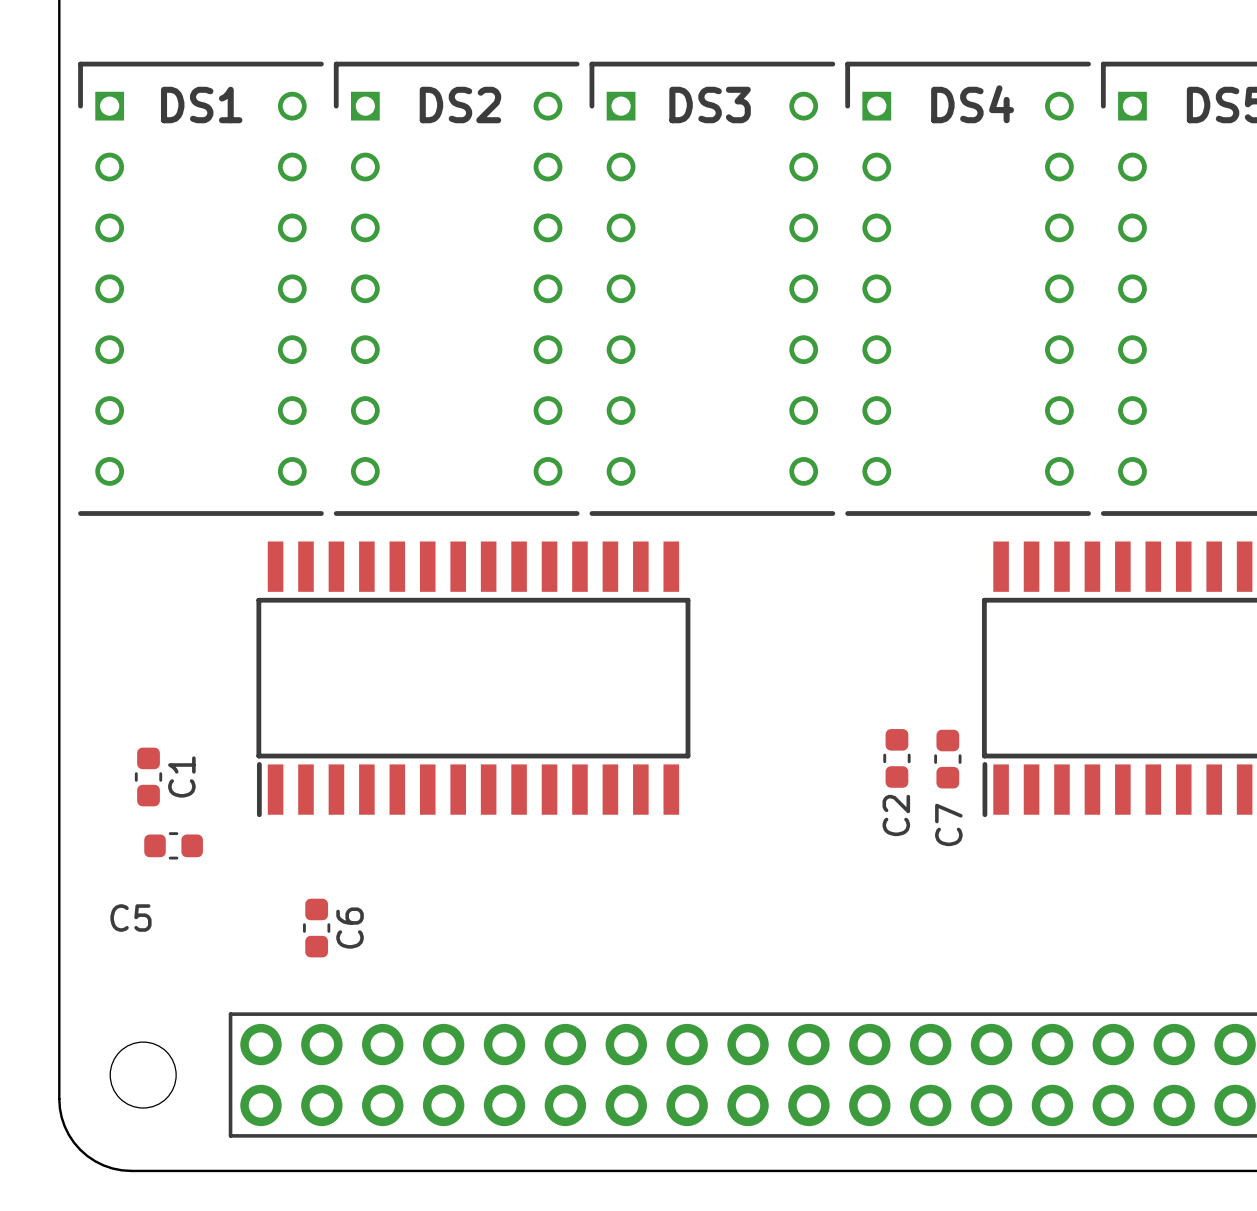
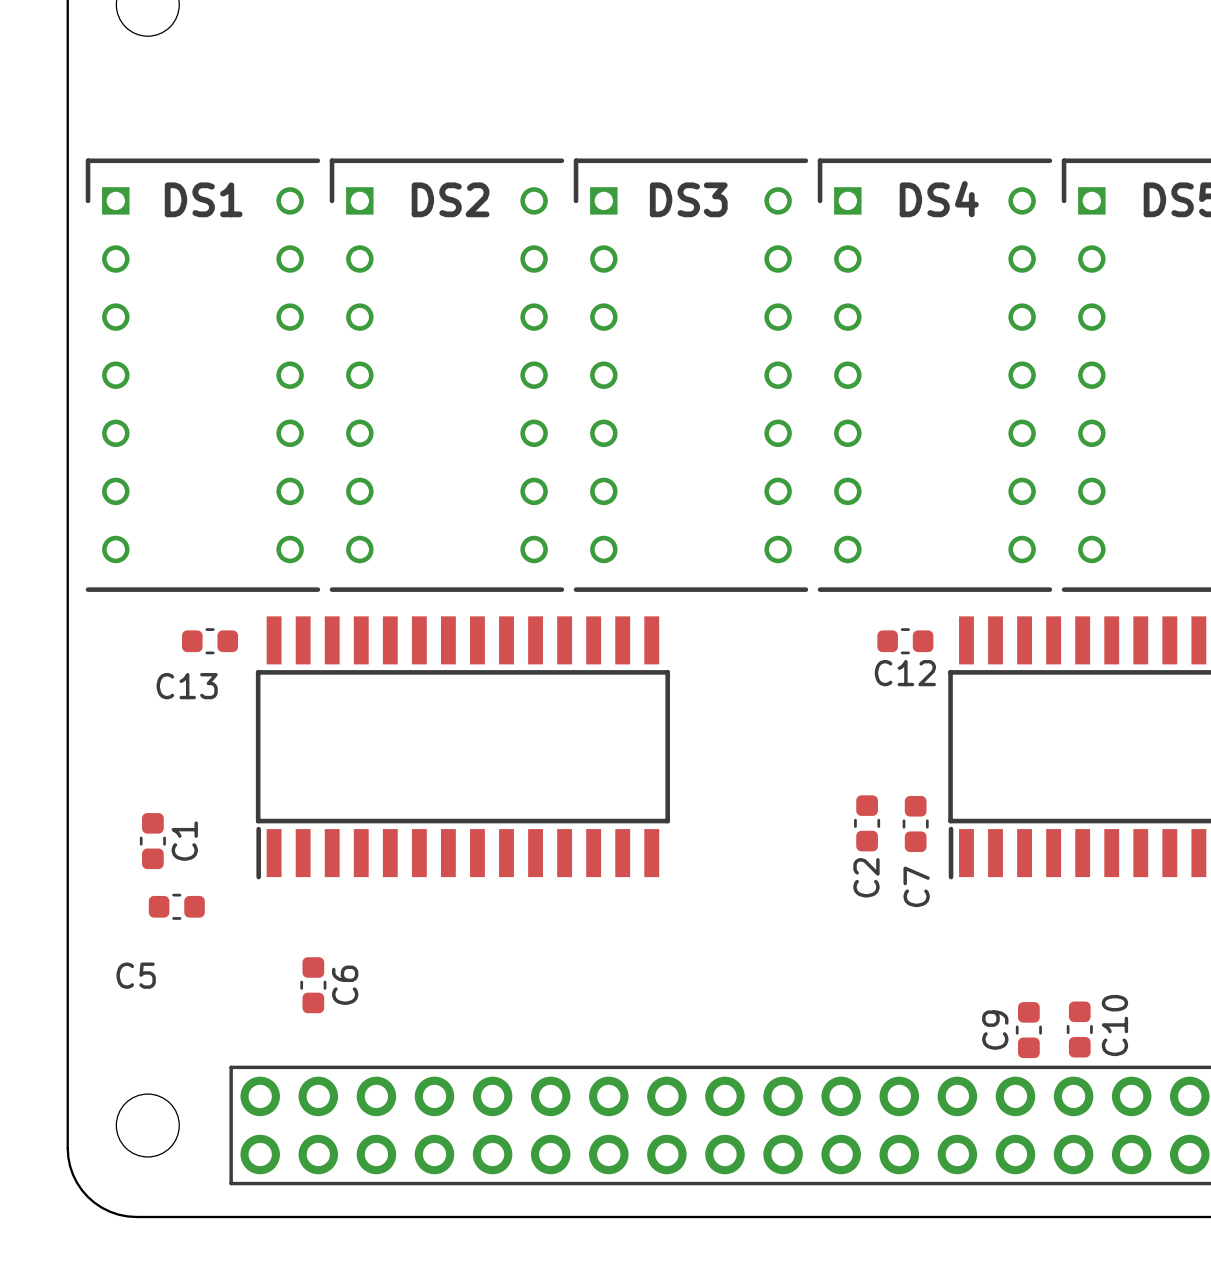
C13: none -> (210, 641)
C12: none -> (905, 641)
C10: none -> (1079, 1029)
C9: none -> (1028, 1030)

